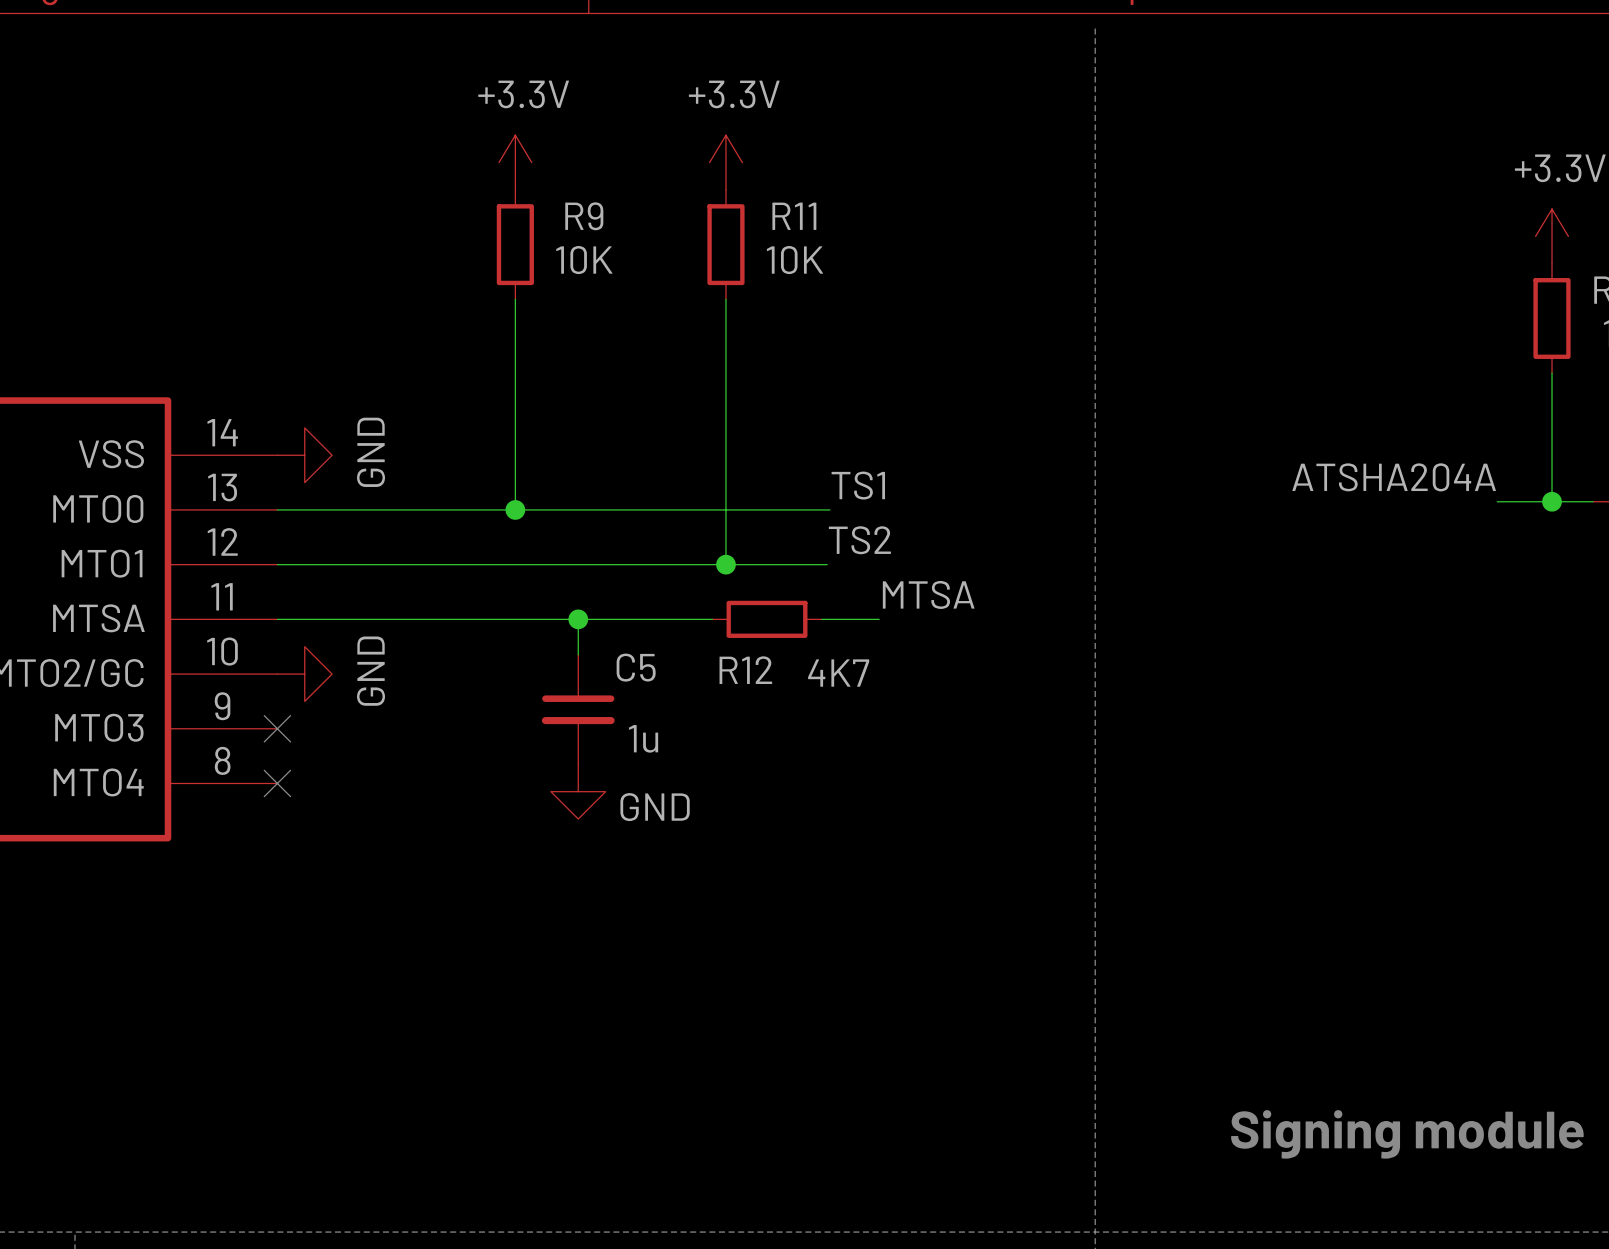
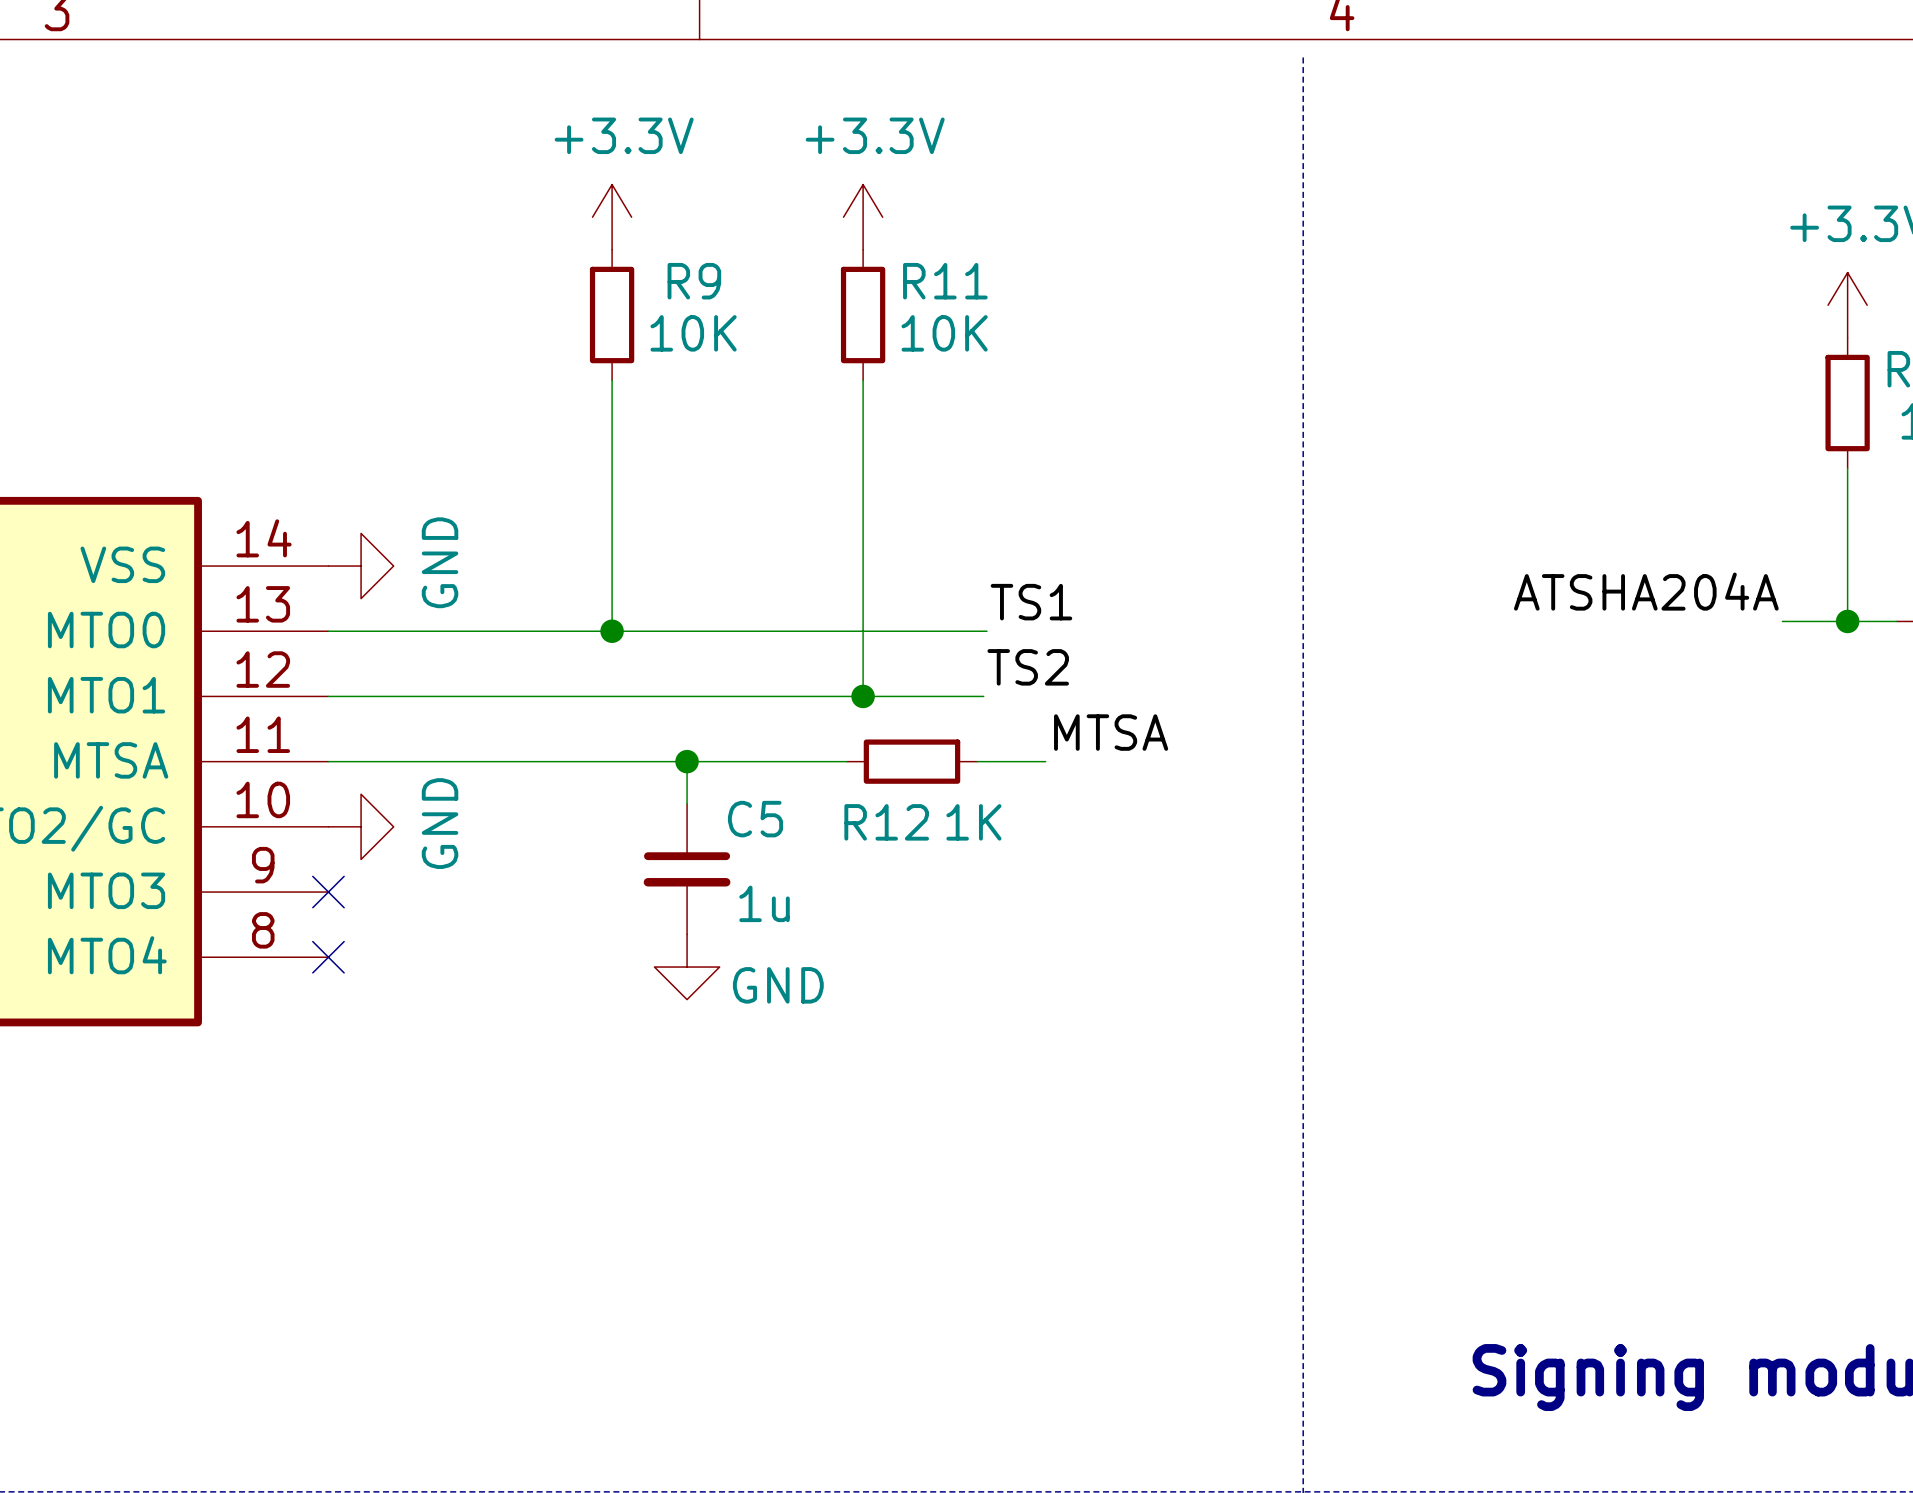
R12 value: 4K7 (838, 673) -> 1K (973, 822)

